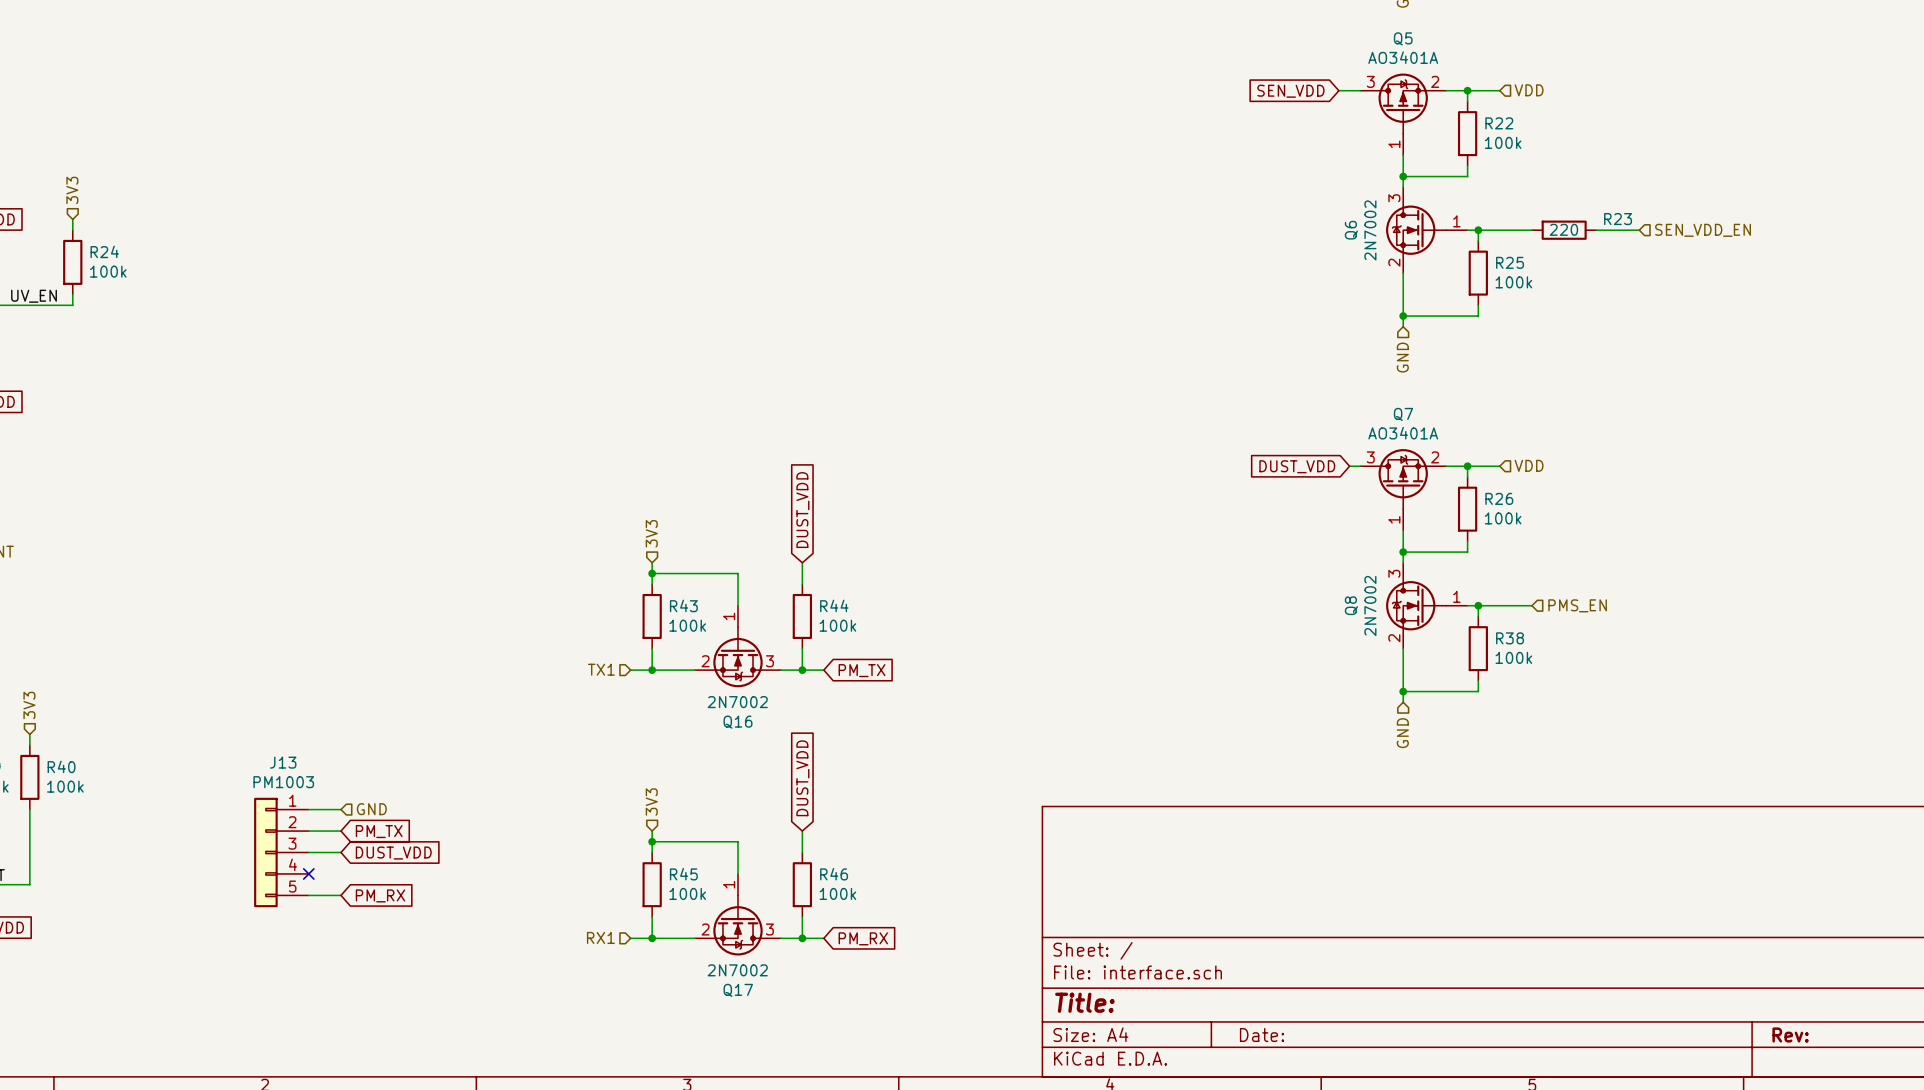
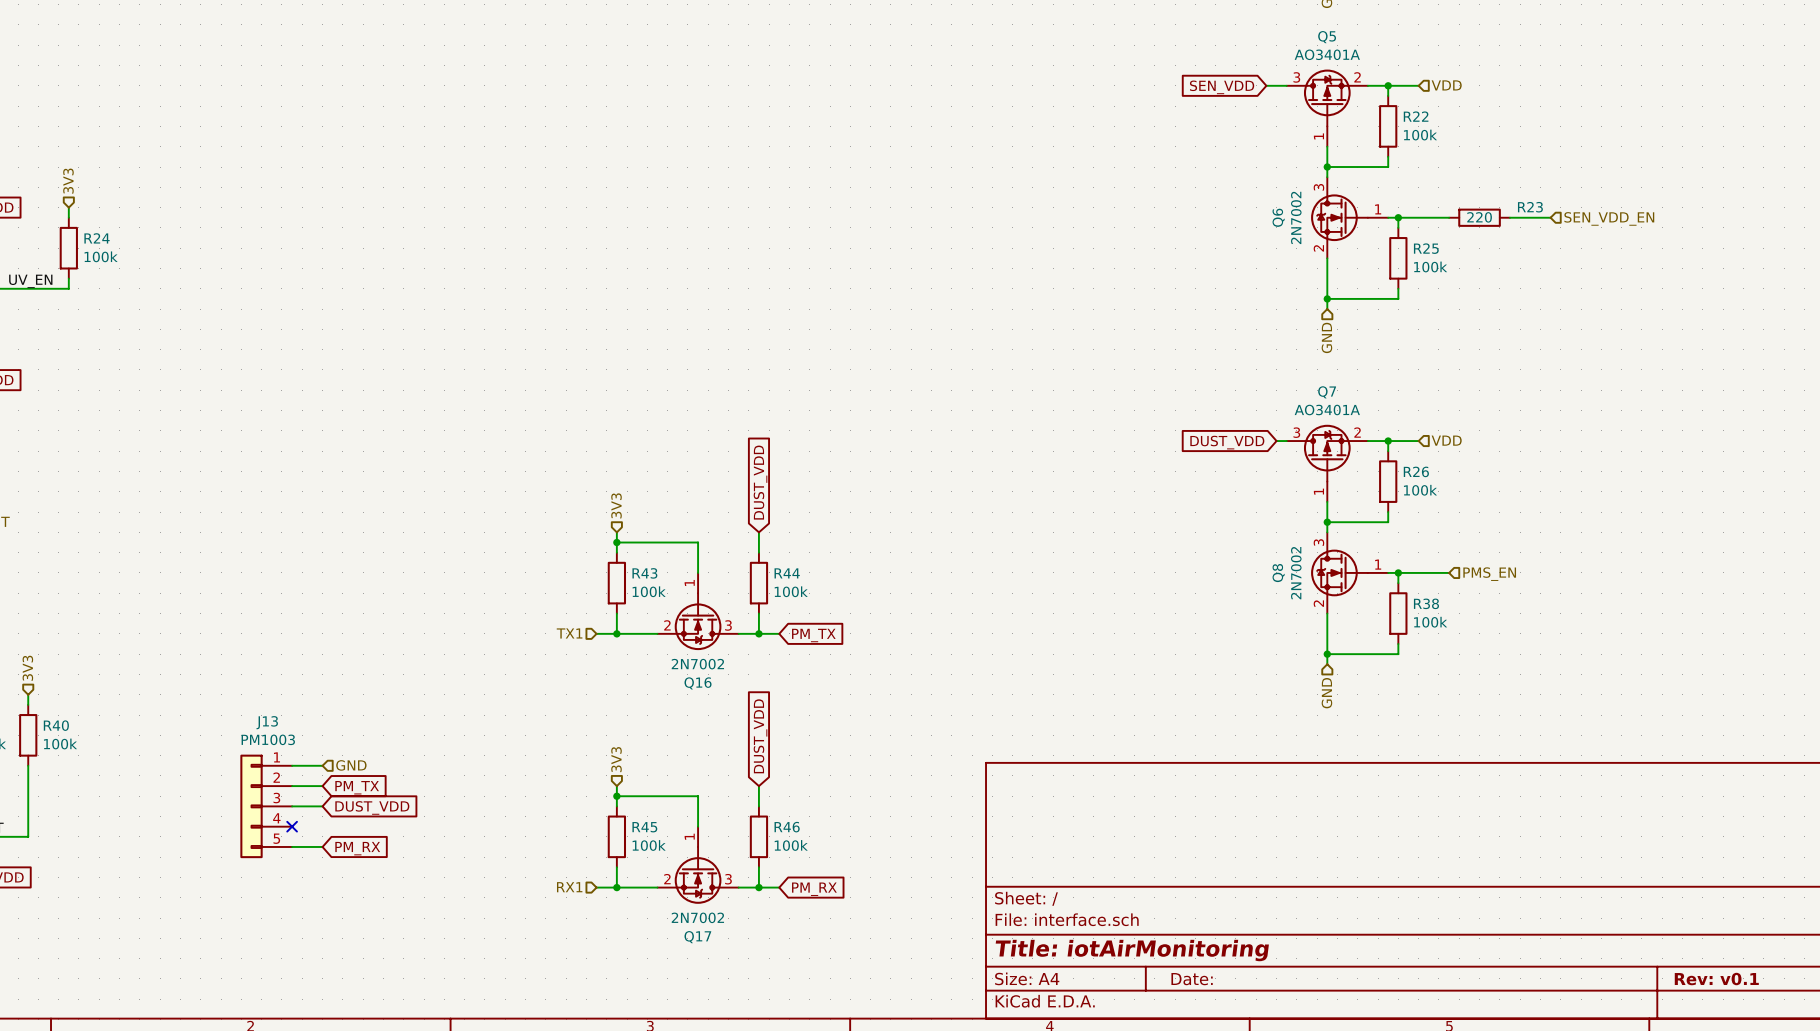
title block: Title: (1084, 1002) -> Title: iotAirMonitoring (1132, 950)
title block: Rev: (1790, 1035) -> Rev: v0.1 (1716, 979)

